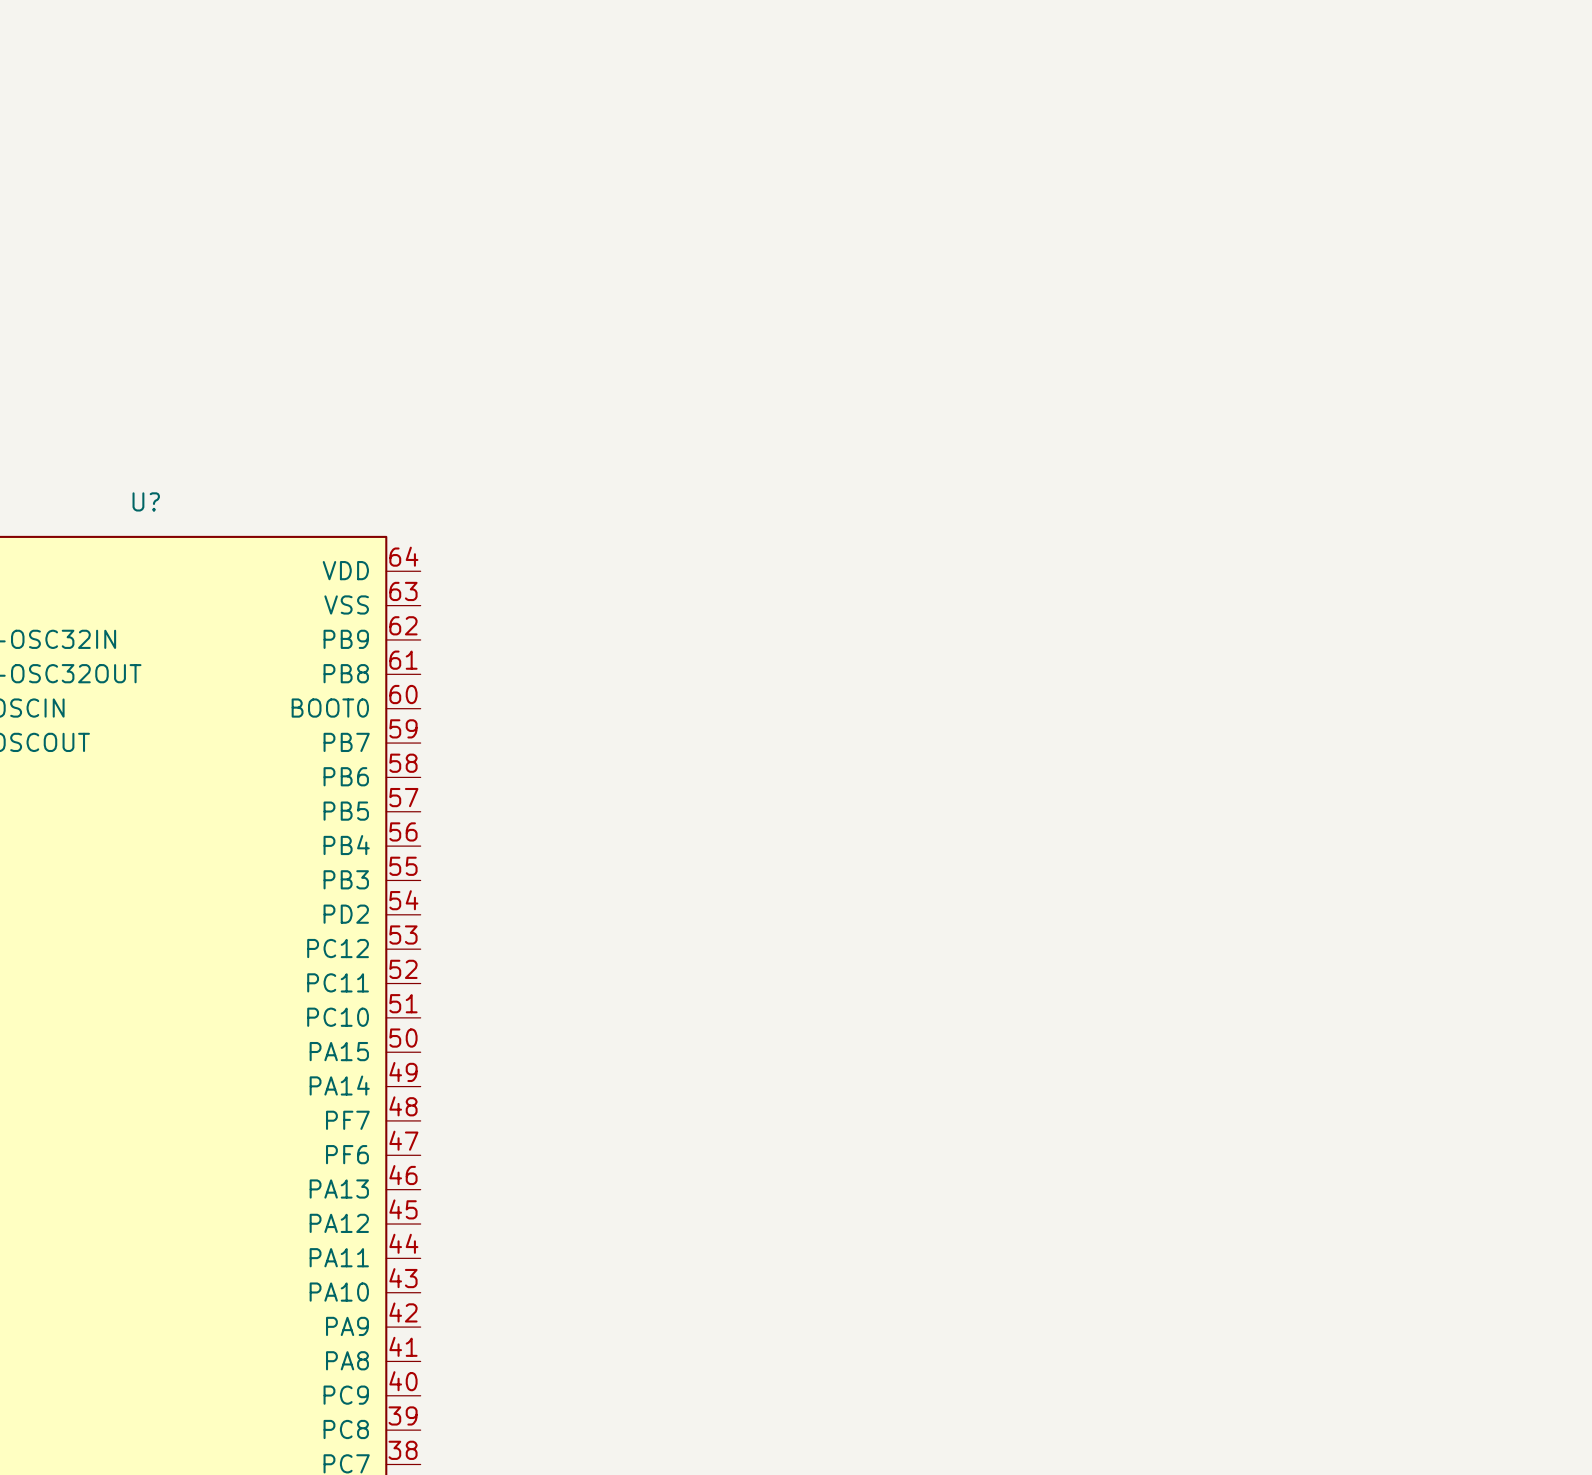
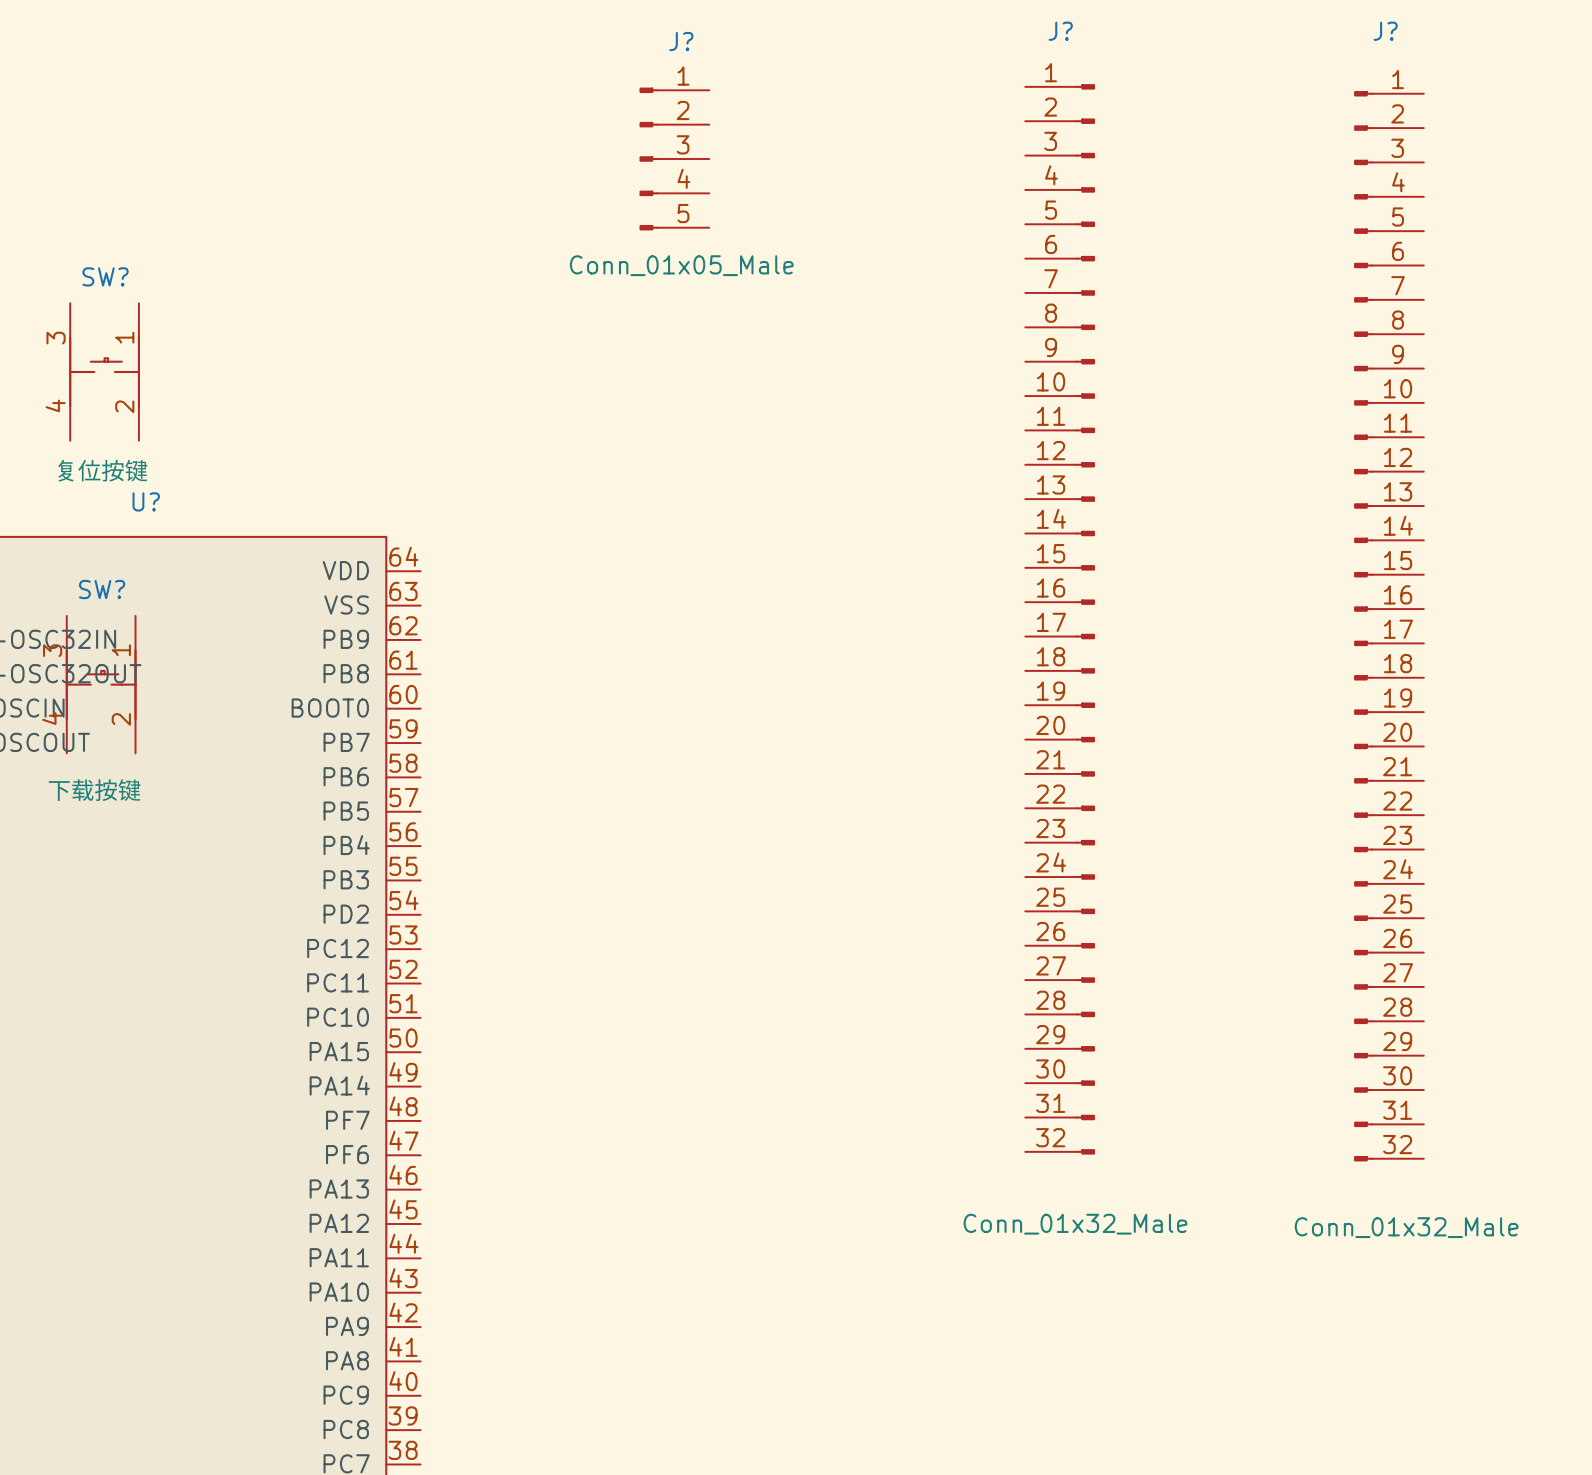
J?: none -> Conn_01x05_Male (674, 159)
SW?: none -> 复位按键 (104, 372)
J?: none -> Conn_01x32_Male (1060, 619)
J?: none -> Conn_01x32_Male (1388, 626)
SW?: none -> 下载按键 (101, 684)

